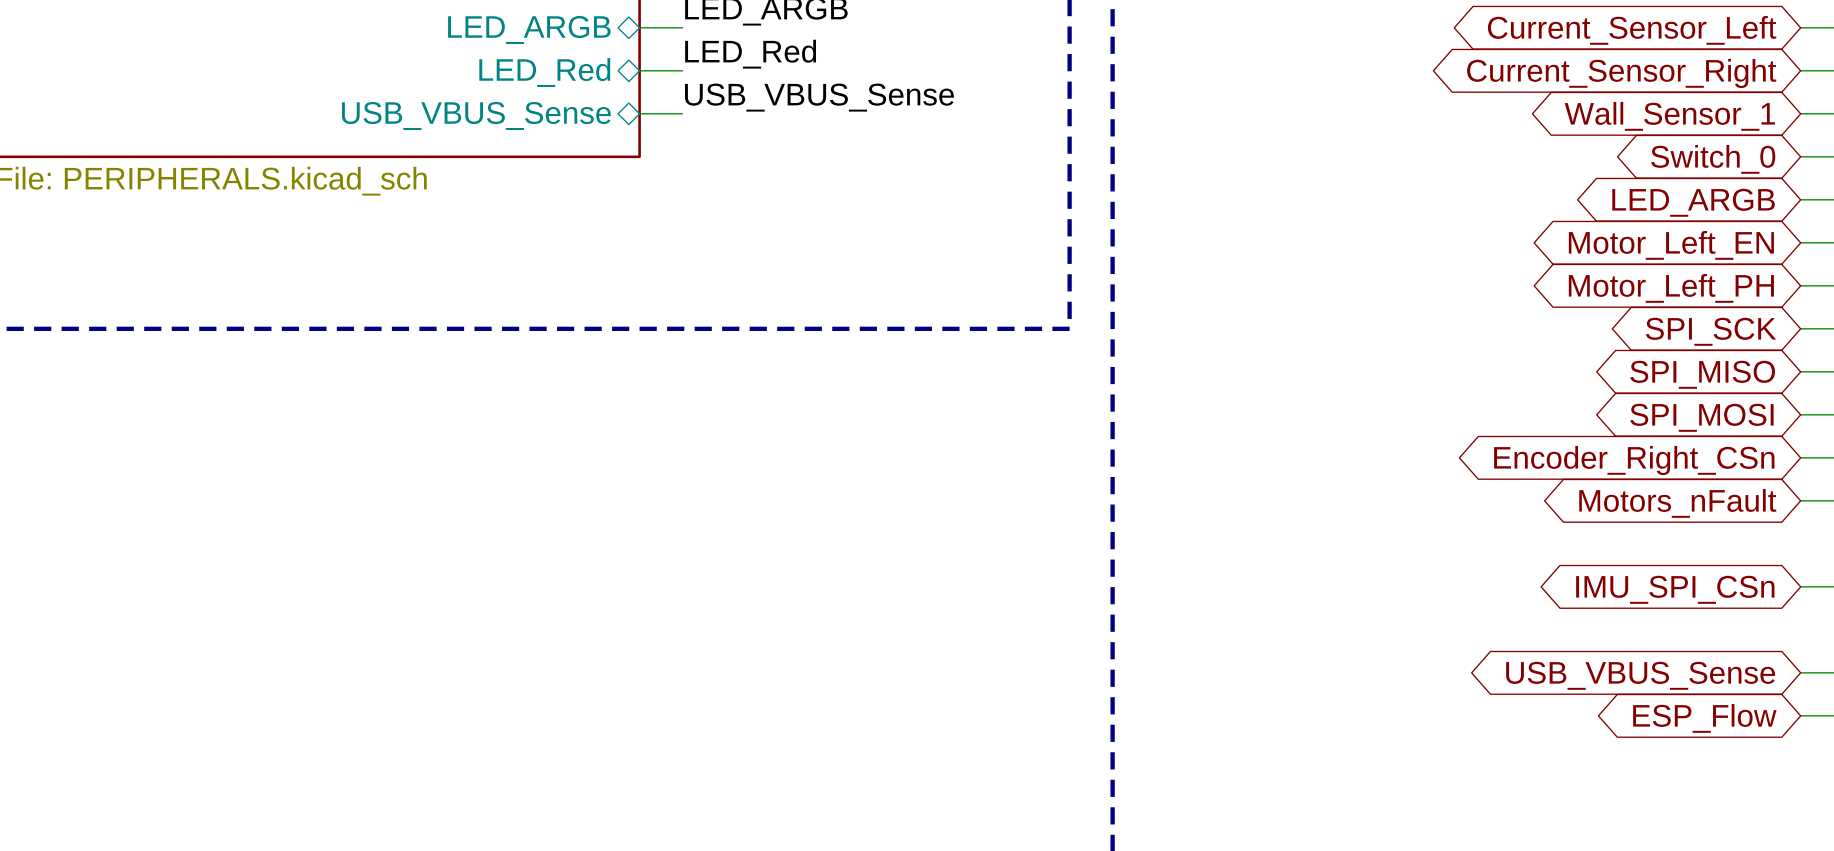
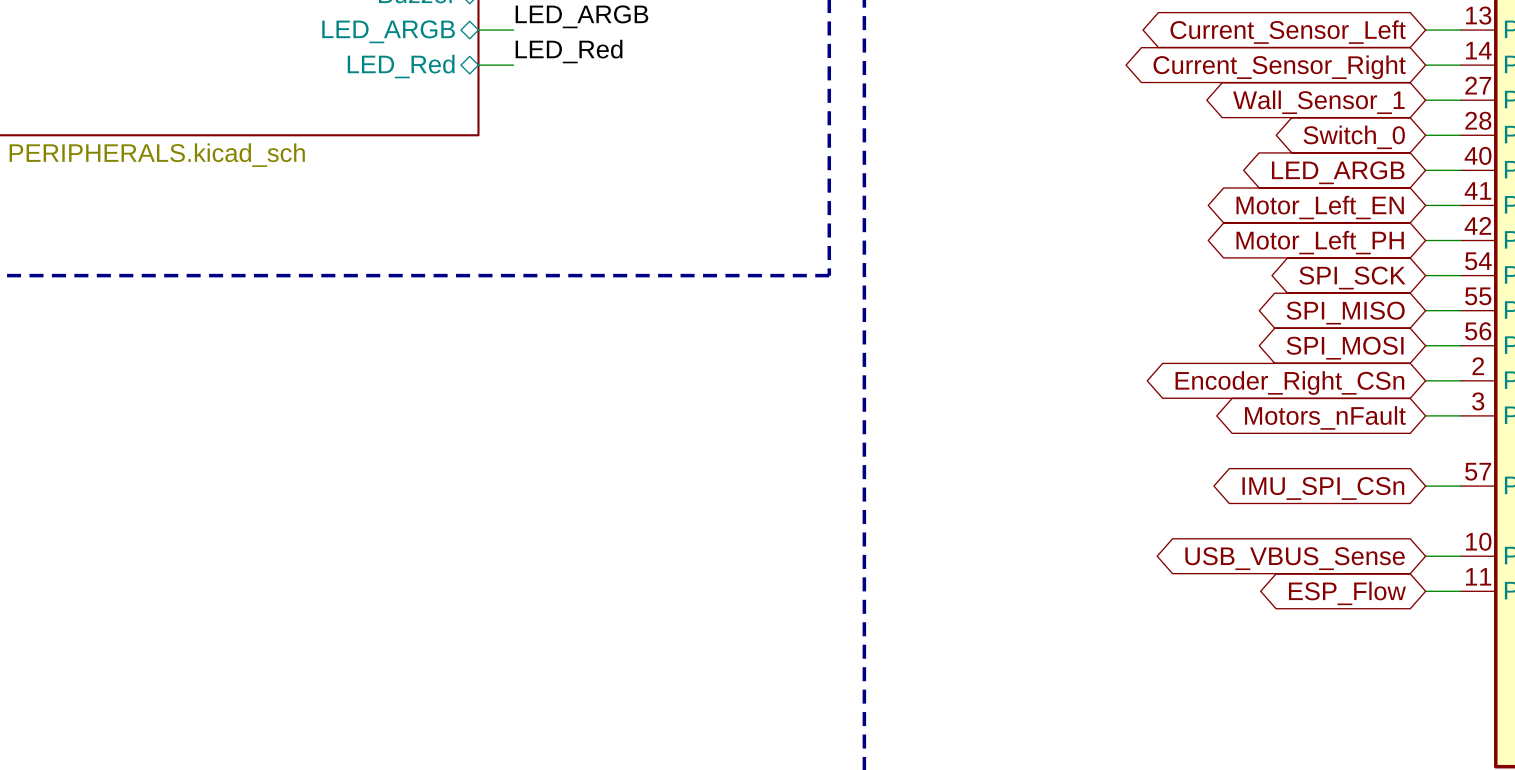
label: USB_VBUS_Sense (819, 97) -> none
wire: (639, 113) (682, 113) -> none
sheet pin: USB_VBUS_Sense (476, 115) -> none

